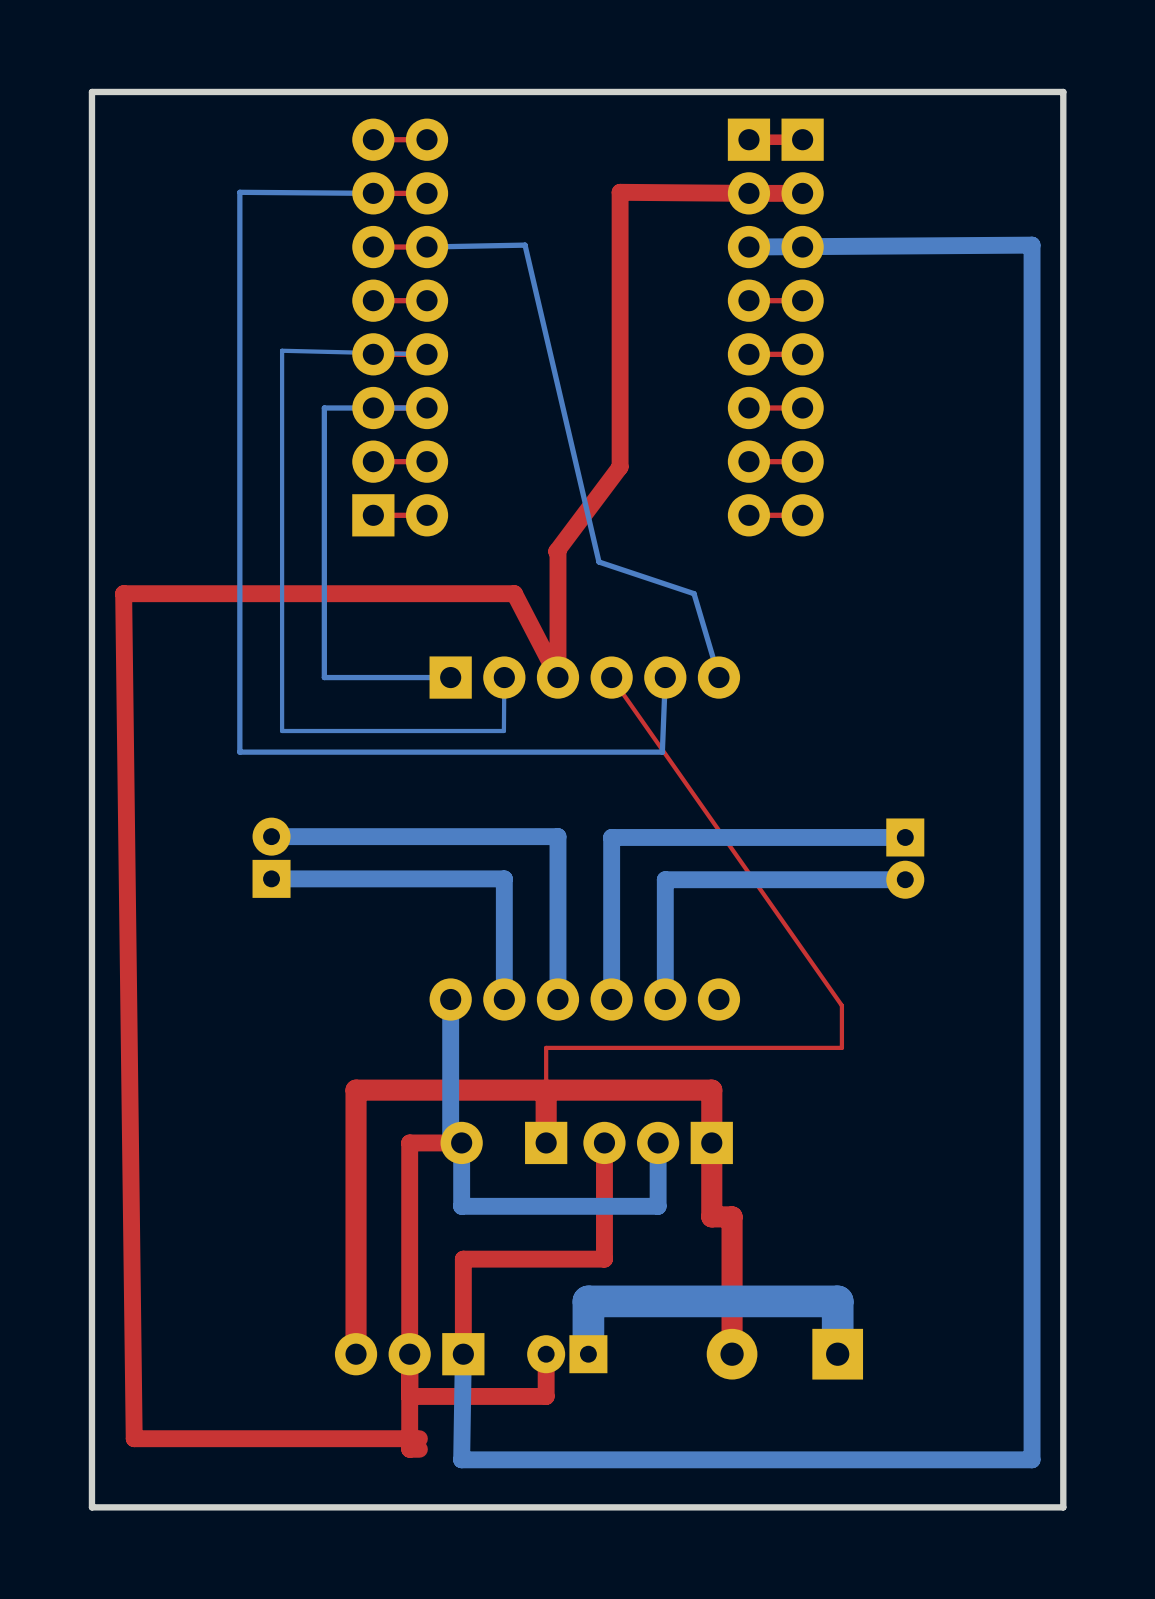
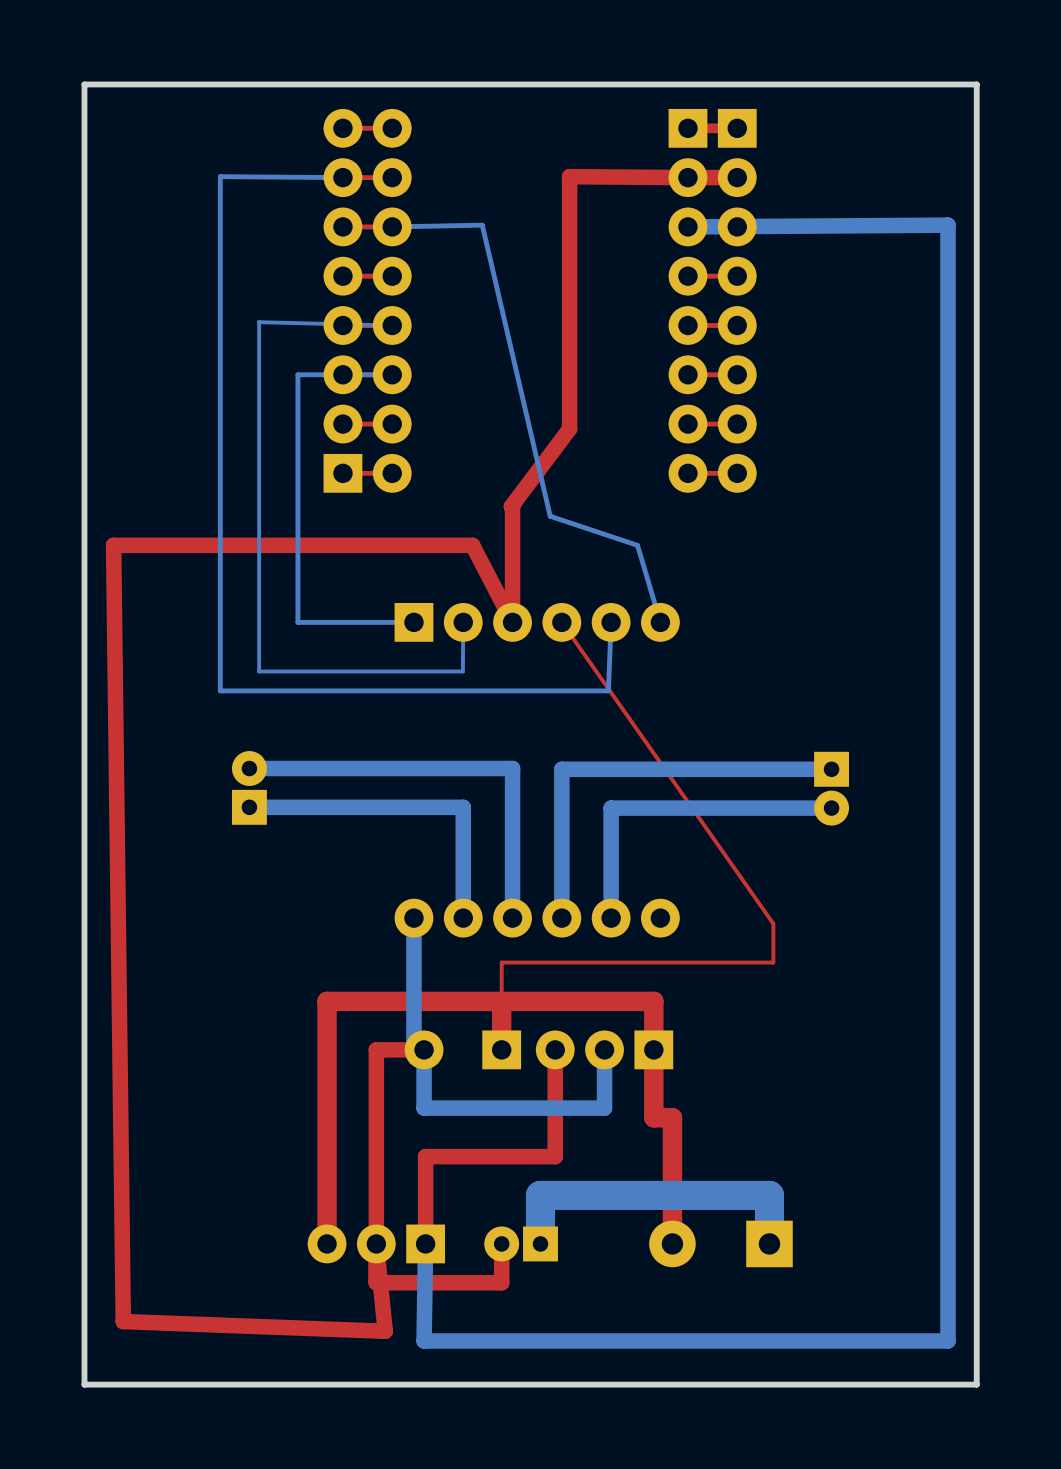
top track: (409, 1396) (409, 1449) (419, 1449) -> none
top track: (419, 1438) (134, 1438) -> (376, 1243) (385, 1331) (123, 1321)

